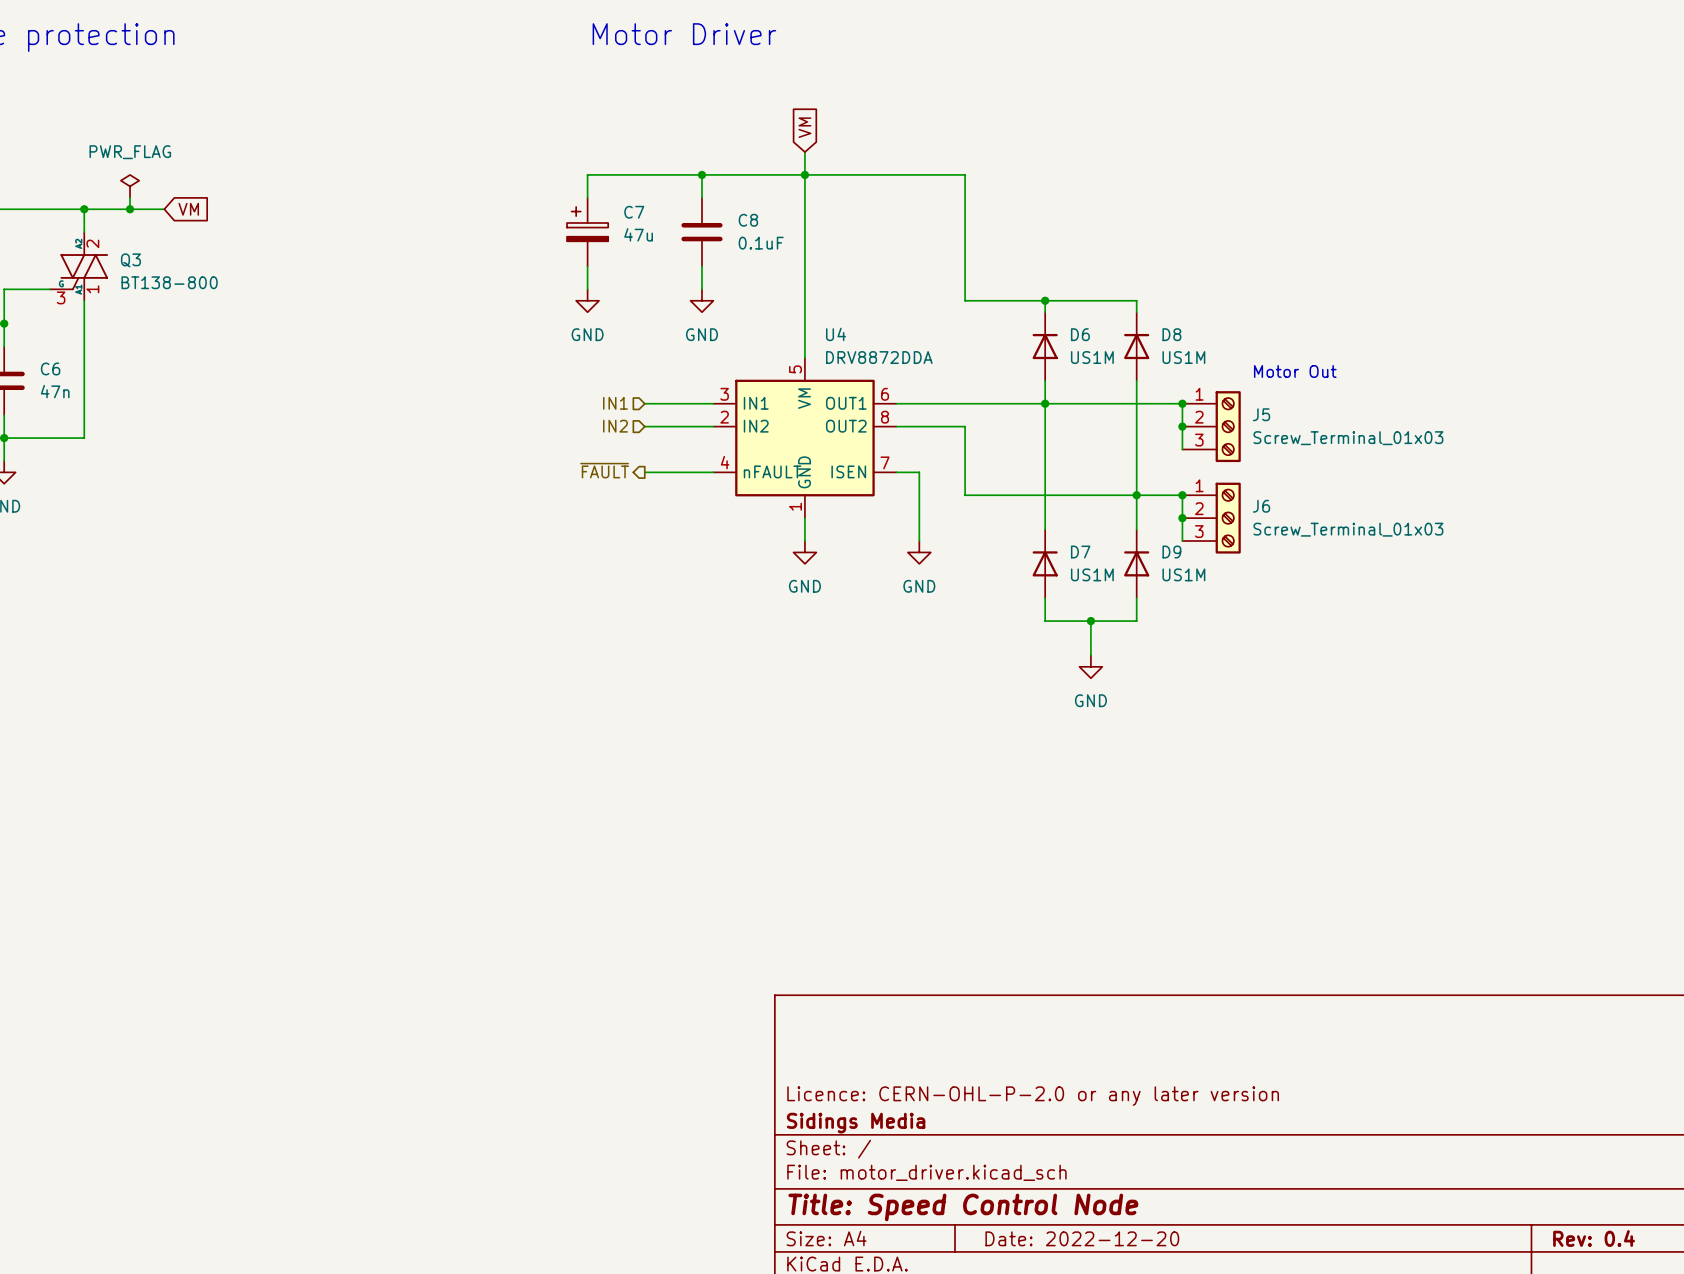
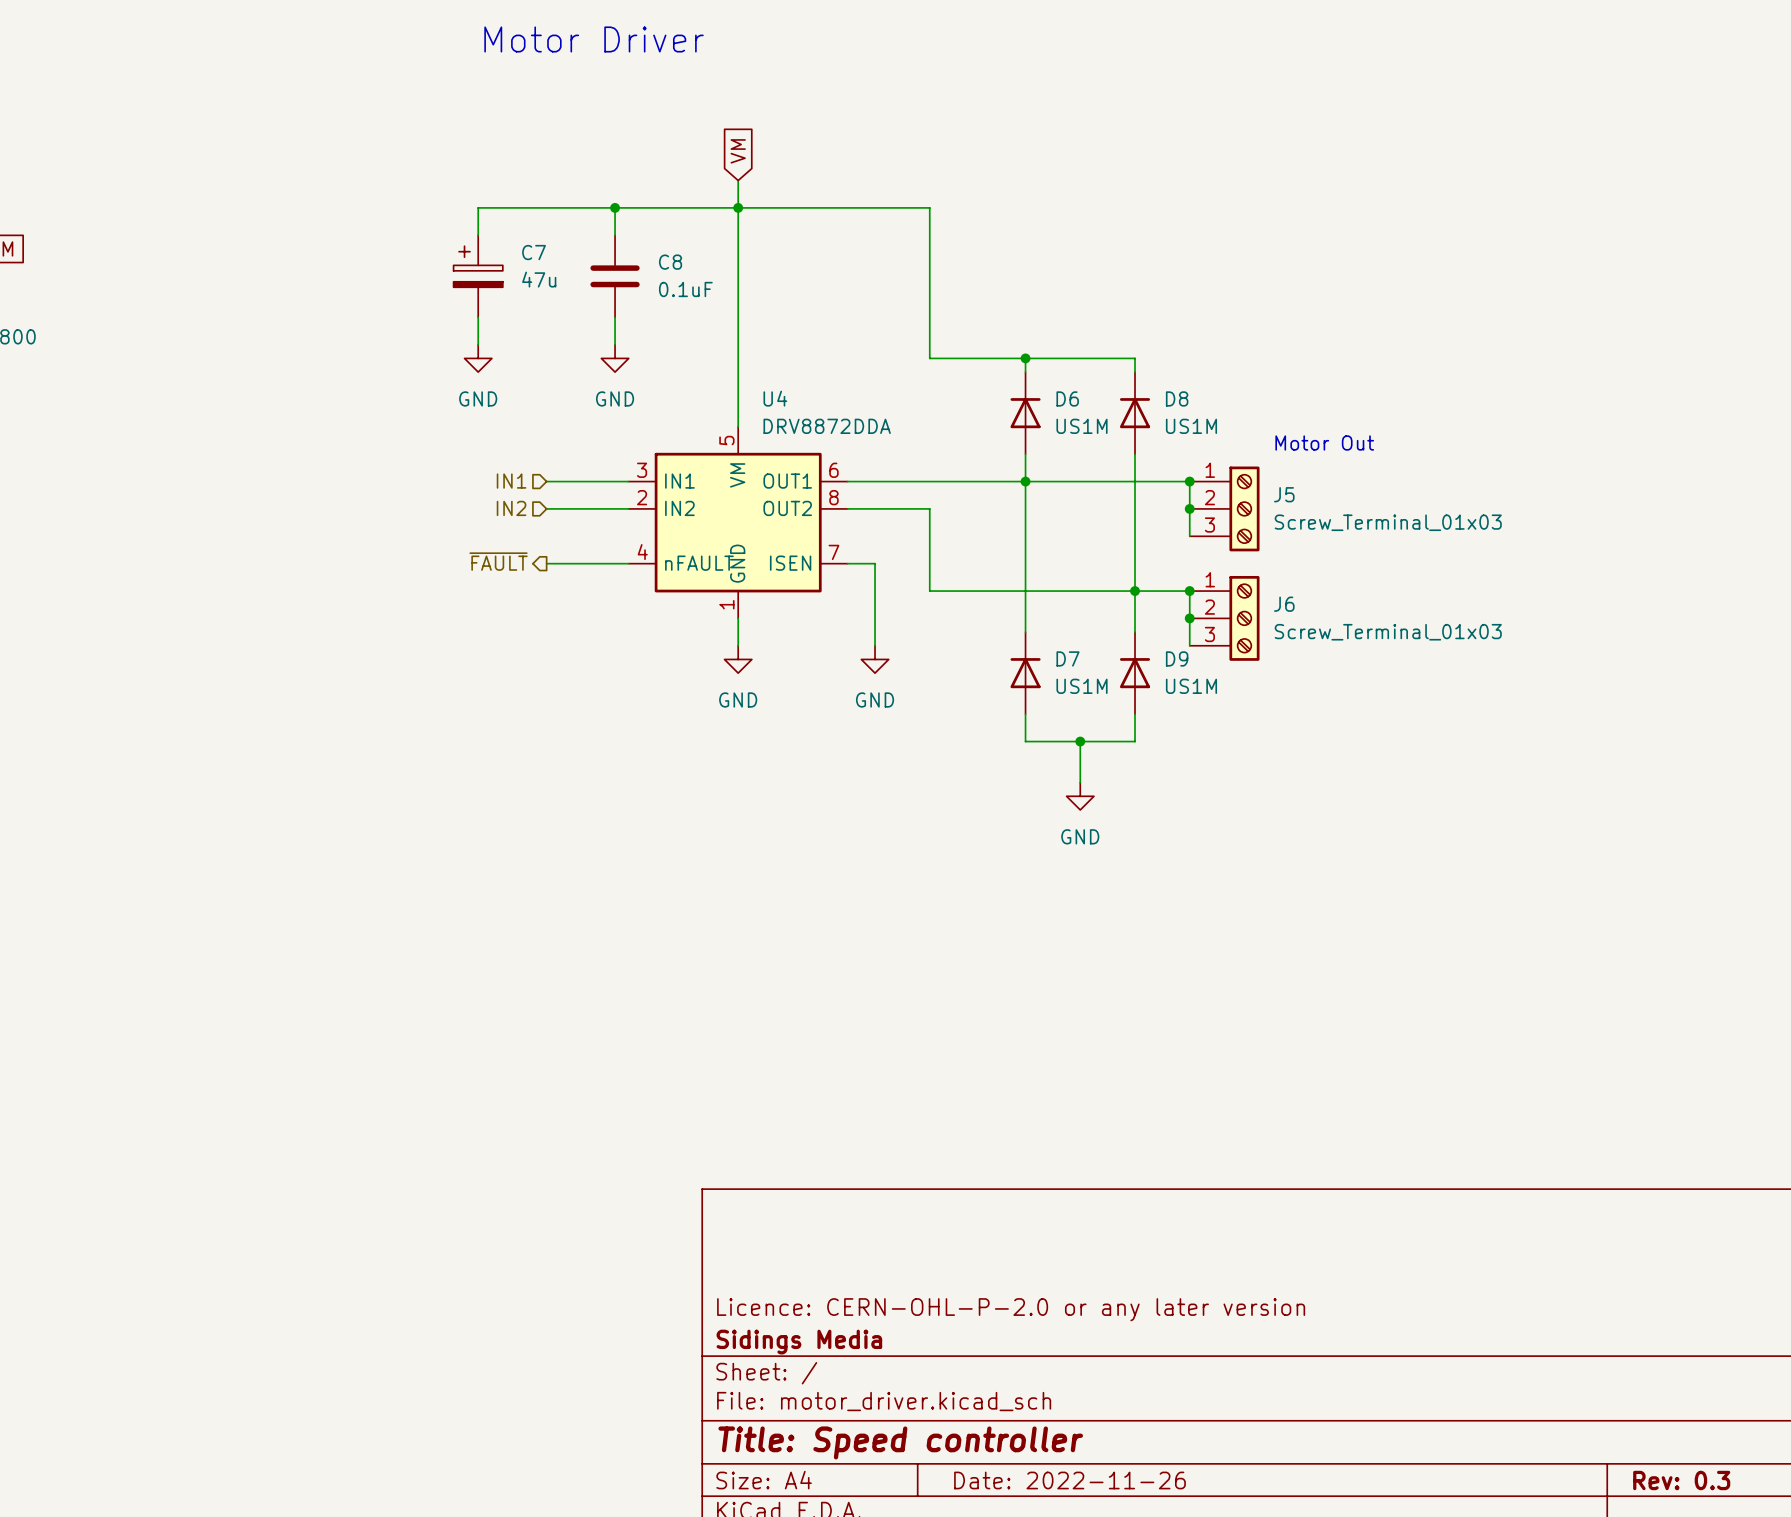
title block: Title: Speed Control Node (963, 1207) -> Title: Speed controller (900, 1442)
title block: Date: 2022-12-20 (1082, 1238) -> Date: 2022-11-26 (1069, 1480)
title block: Rev: 0.4 (1594, 1238) -> Rev: 0.3 (1681, 1480)

